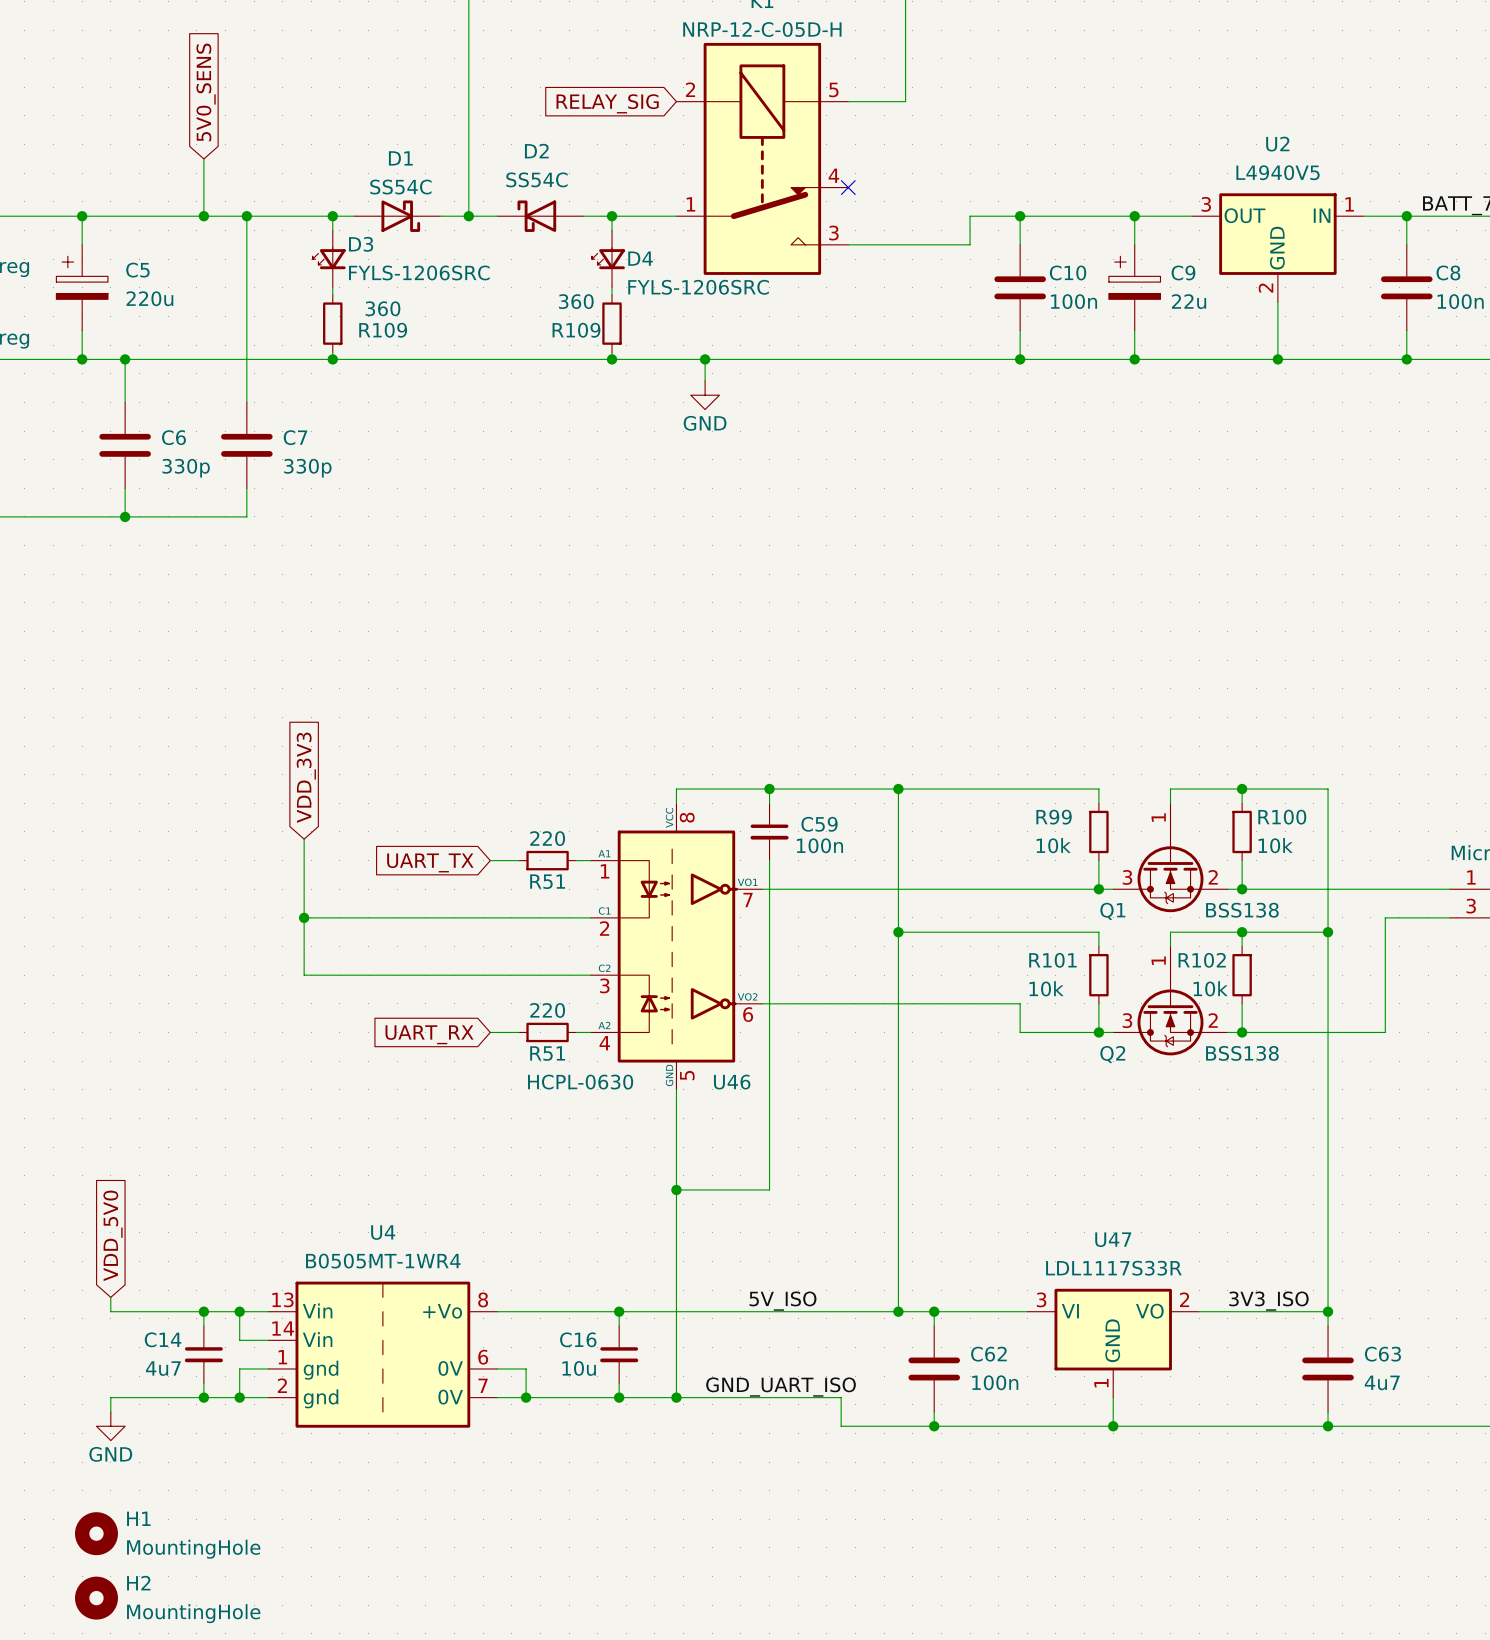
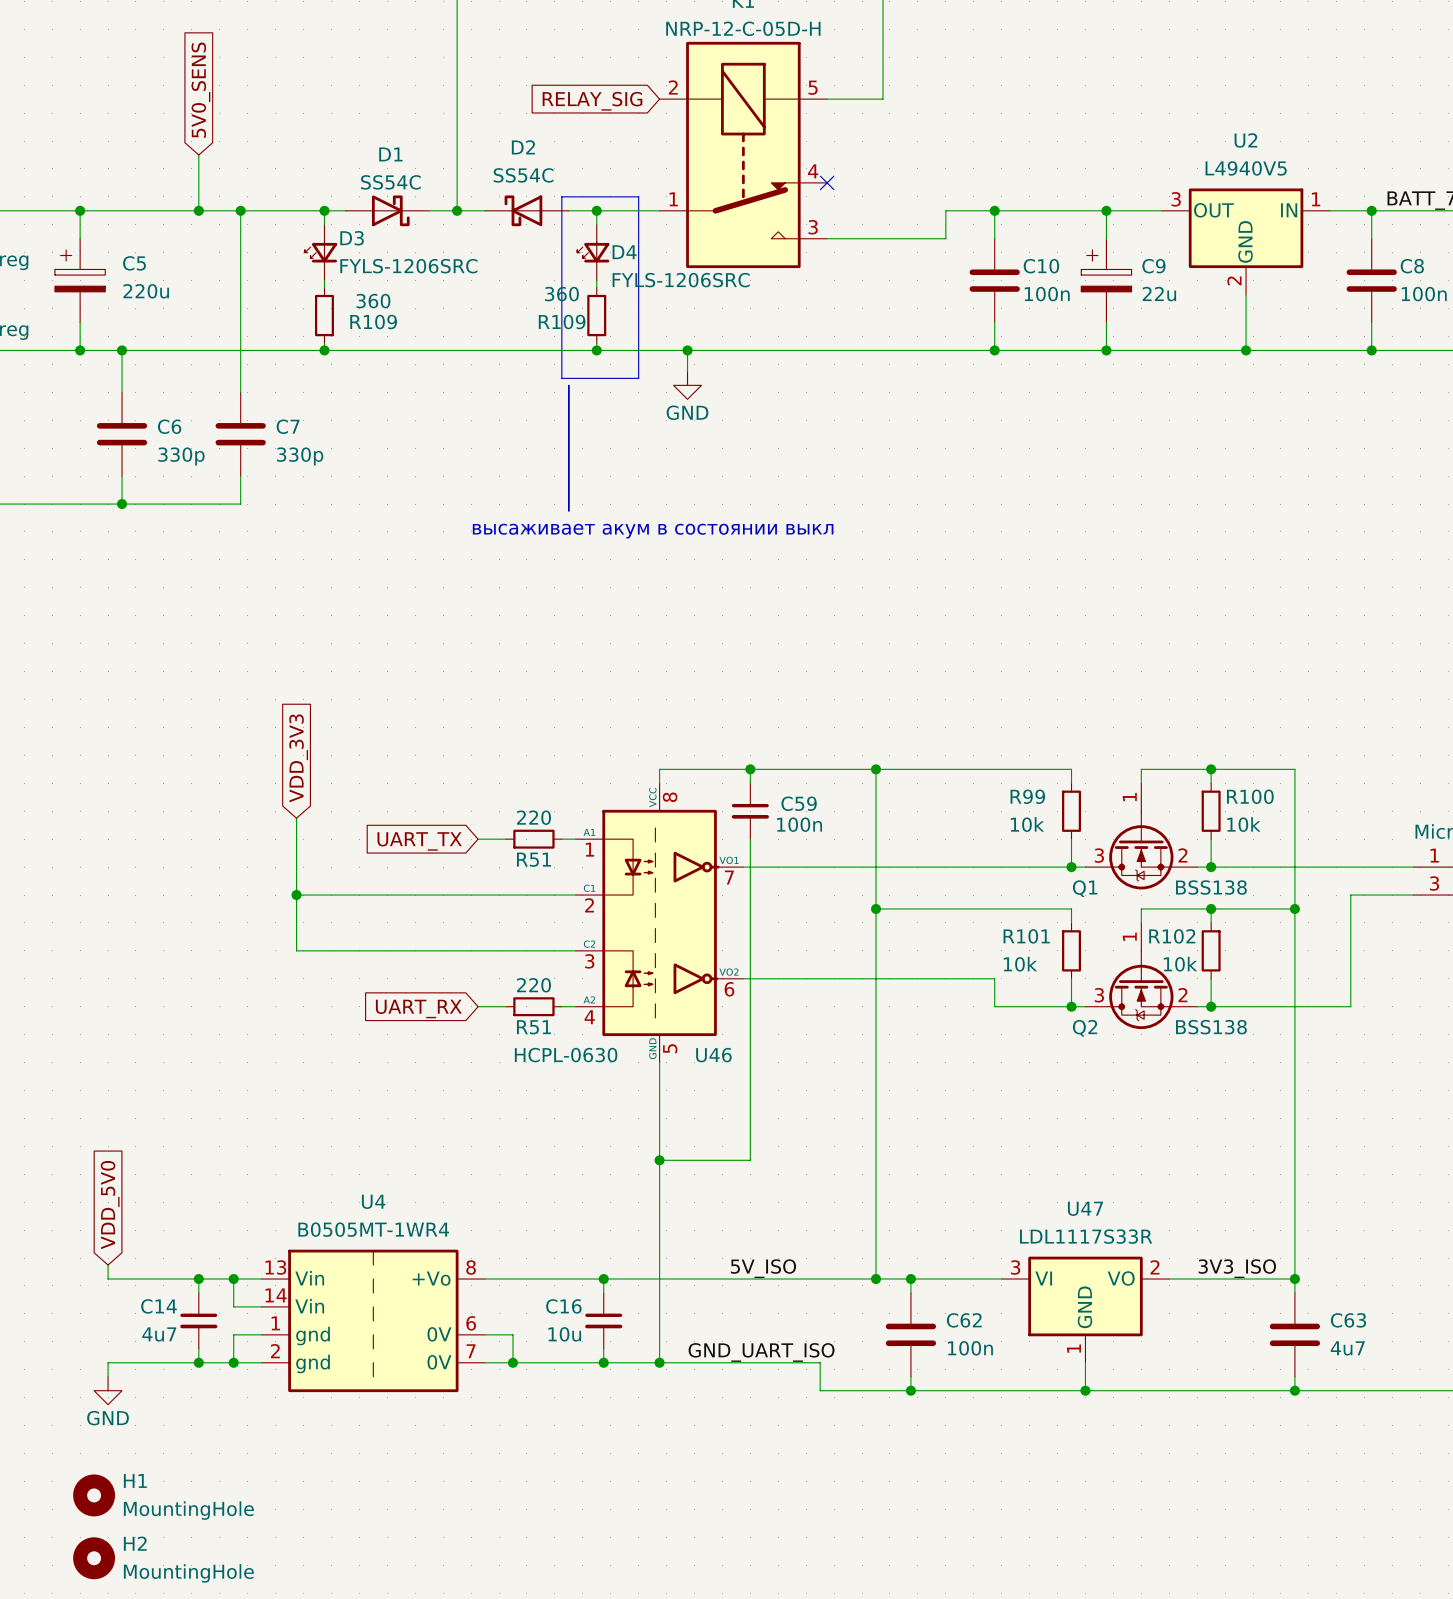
line: none -> (561, 196) (638, 196) (638, 378) (561, 378) (561, 196)
line: none -> (568, 385) (568, 511)
text: none -> высаживает акум в состоянии выкл (653, 531)

